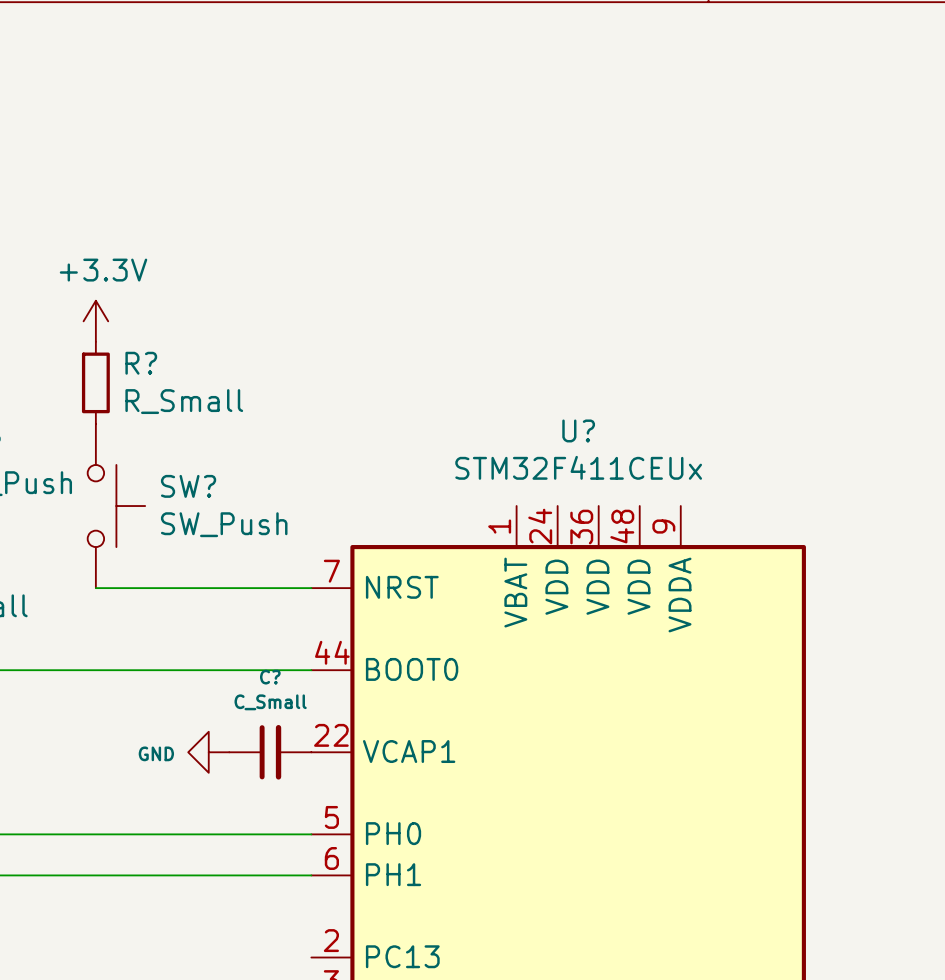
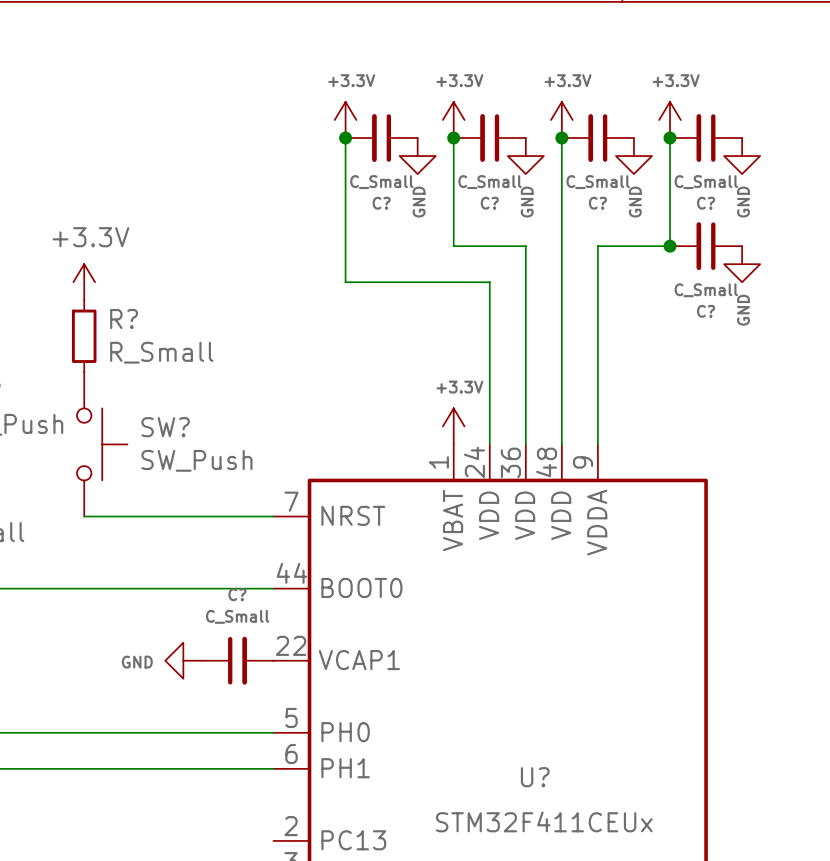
power symbol: none -> +3.3V (345, 119)
power symbol: none -> +3.3V (453, 119)
power symbol: none -> +3.3V (561, 119)
power symbol: none -> +3.3V (670, 119)
wire: none -> (345, 138) (345, 282) (489, 282) (489, 444)
junction: none -> (345, 138)
C?: none -> C_Small (381, 138)
wire: none -> (453, 138) (453, 246) (525, 246) (525, 444)
junction: none -> (453, 138)
C?: none -> C_Small (489, 138)
wire: none -> (561, 138) (561, 444)
junction: none -> (561, 138)
C?: none -> C_Small (597, 138)
wire: none -> (670, 138) (670, 246) (597, 246) (597, 444)
junction: none -> (670, 138)
C?: none -> C_Small (706, 138)
power symbol: none -> GND (417, 156)
power symbol: none -> GND (525, 156)
power symbol: none -> GND (633, 156)
power symbol: none -> GND (742, 156)
junction: none -> (670, 246)
C?: none -> C_Small (706, 246)
power symbol: none -> GND (742, 264)
U? name position: U? (578, 430) -> U? (535, 777)
U? value position: STM32F411CEUx (578, 467) -> STM32F411CEUx (544, 821)
power symbol: none -> +3.3V (453, 426)

